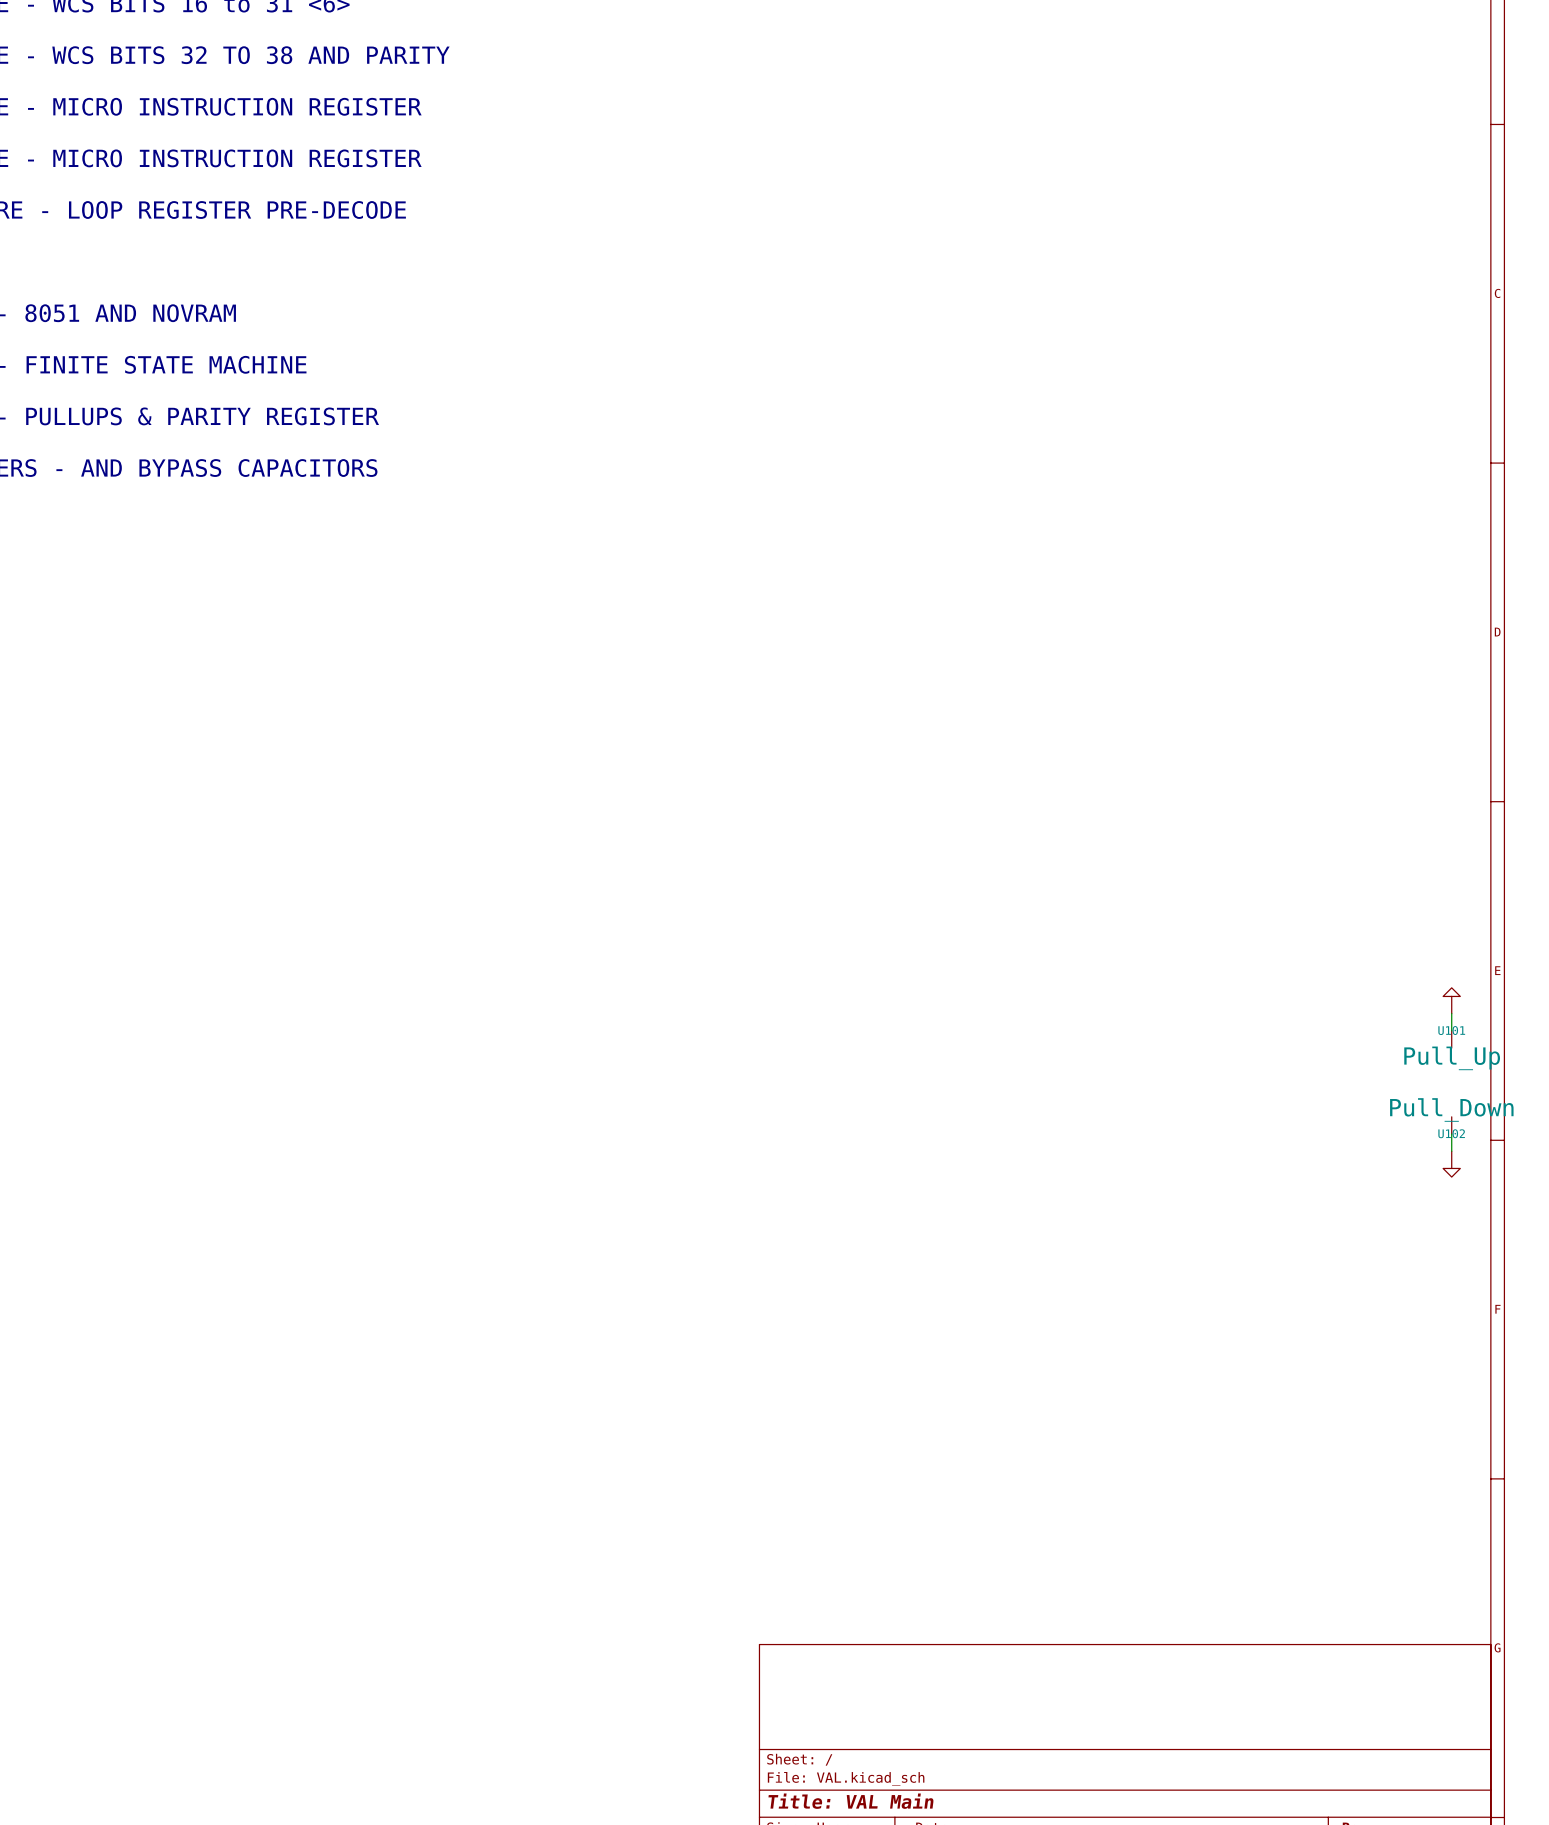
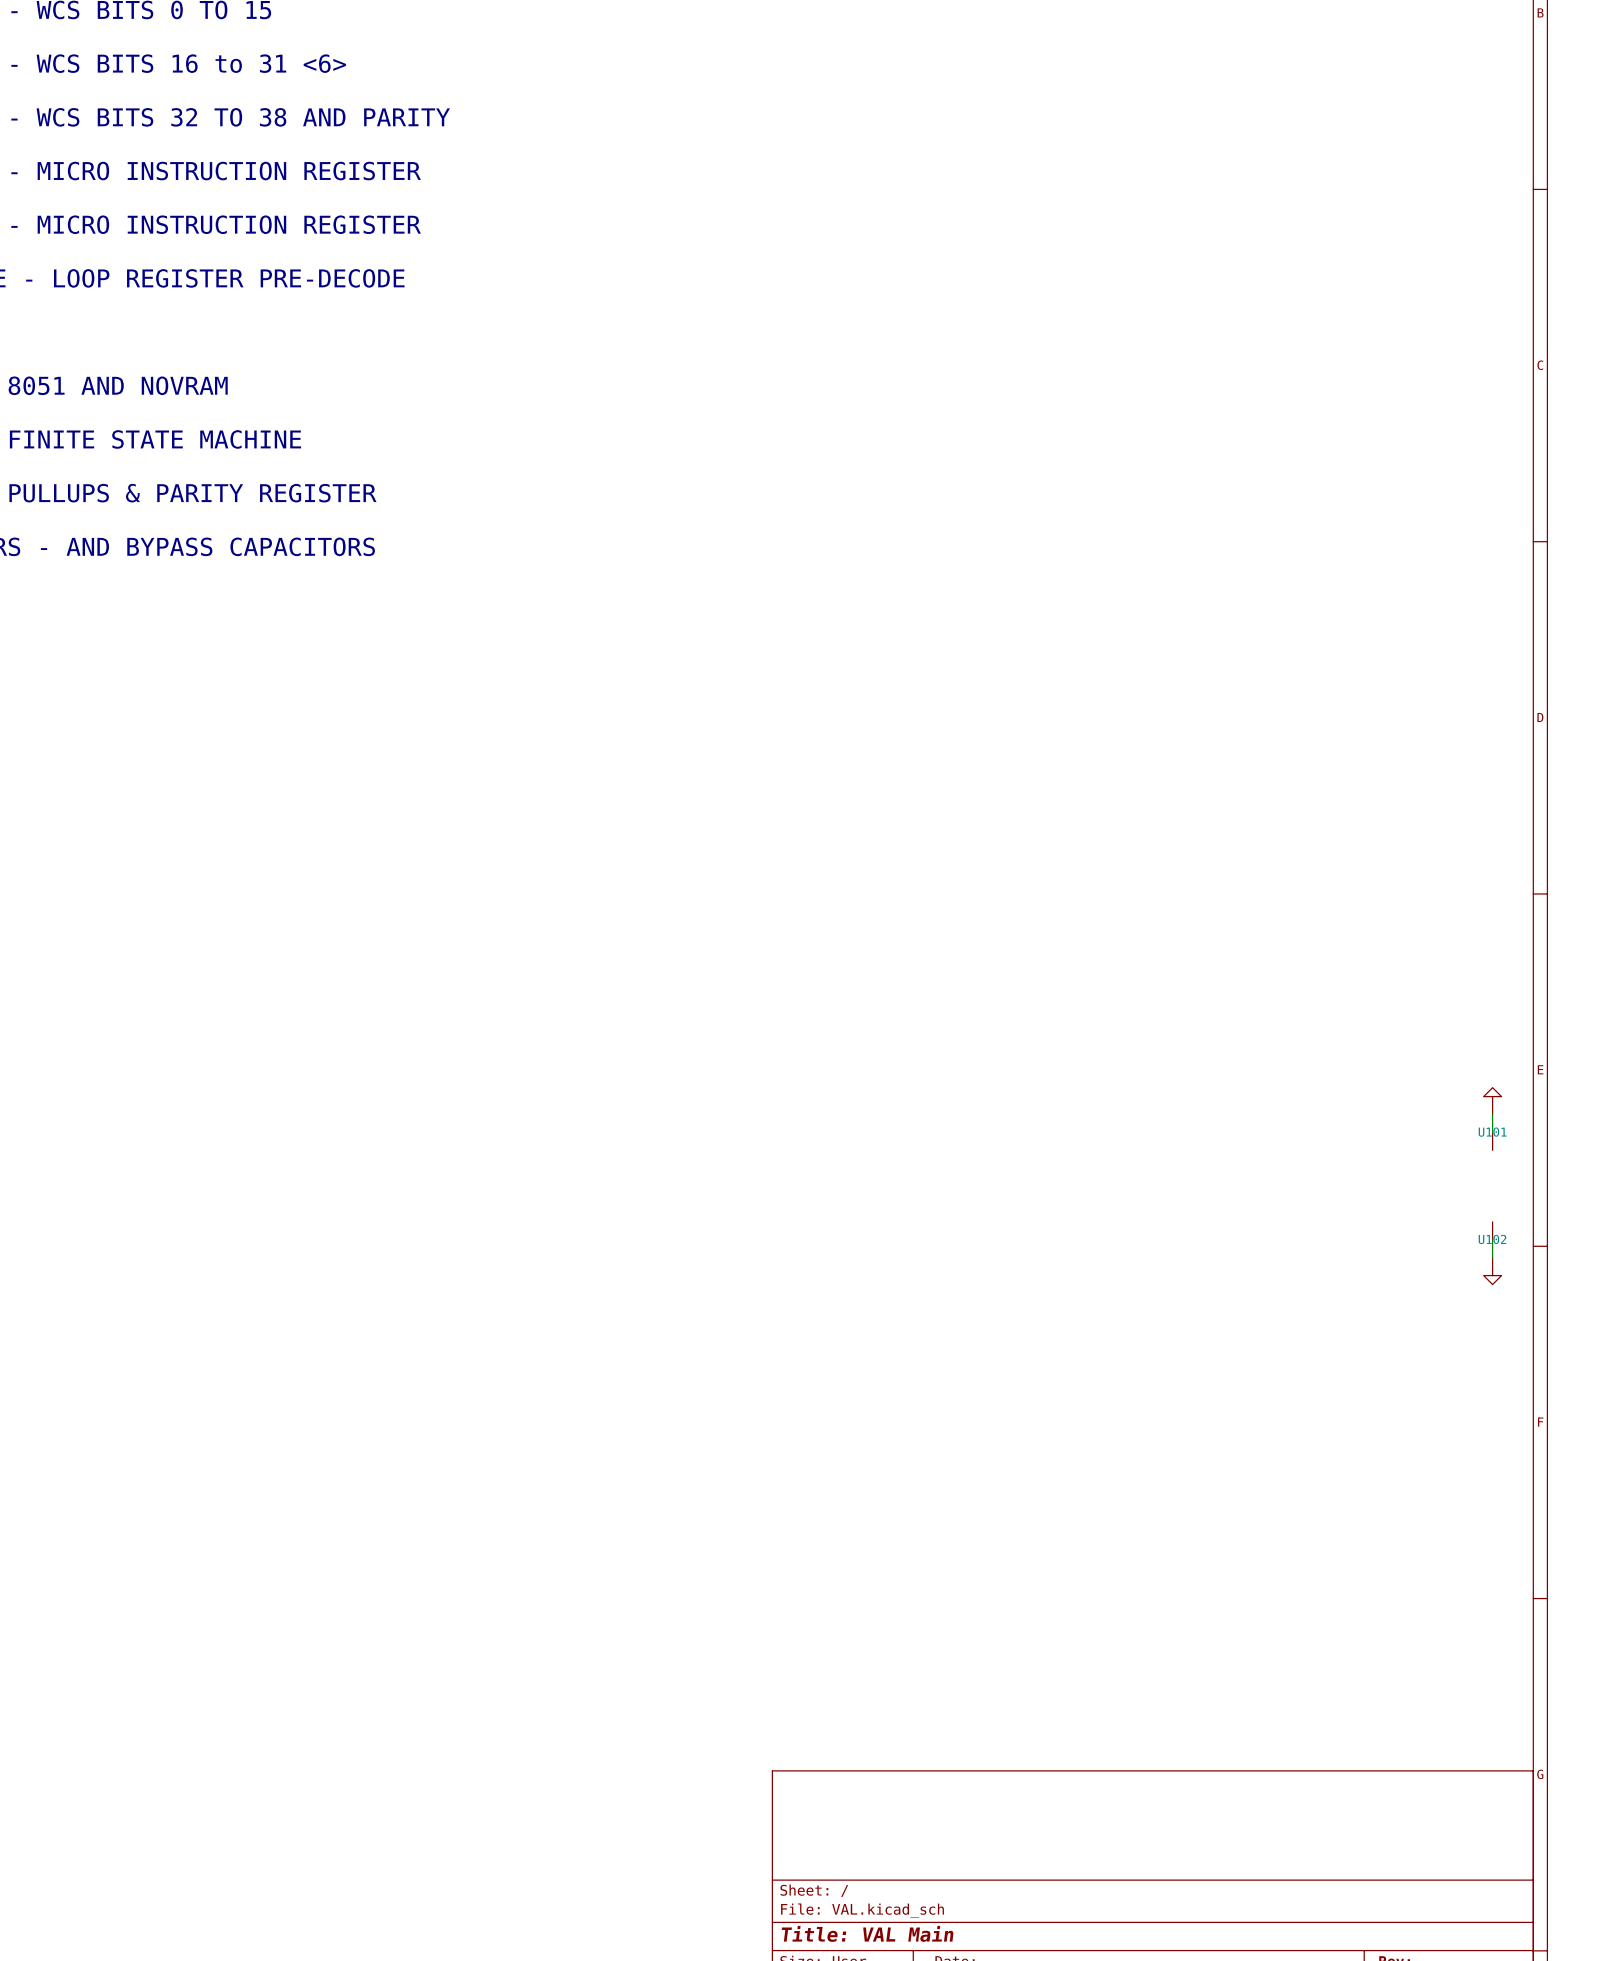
U101 value: Pull_Up (1452, 1058) -> none
U102 value: Pull_Down (1451, 1109) -> none

